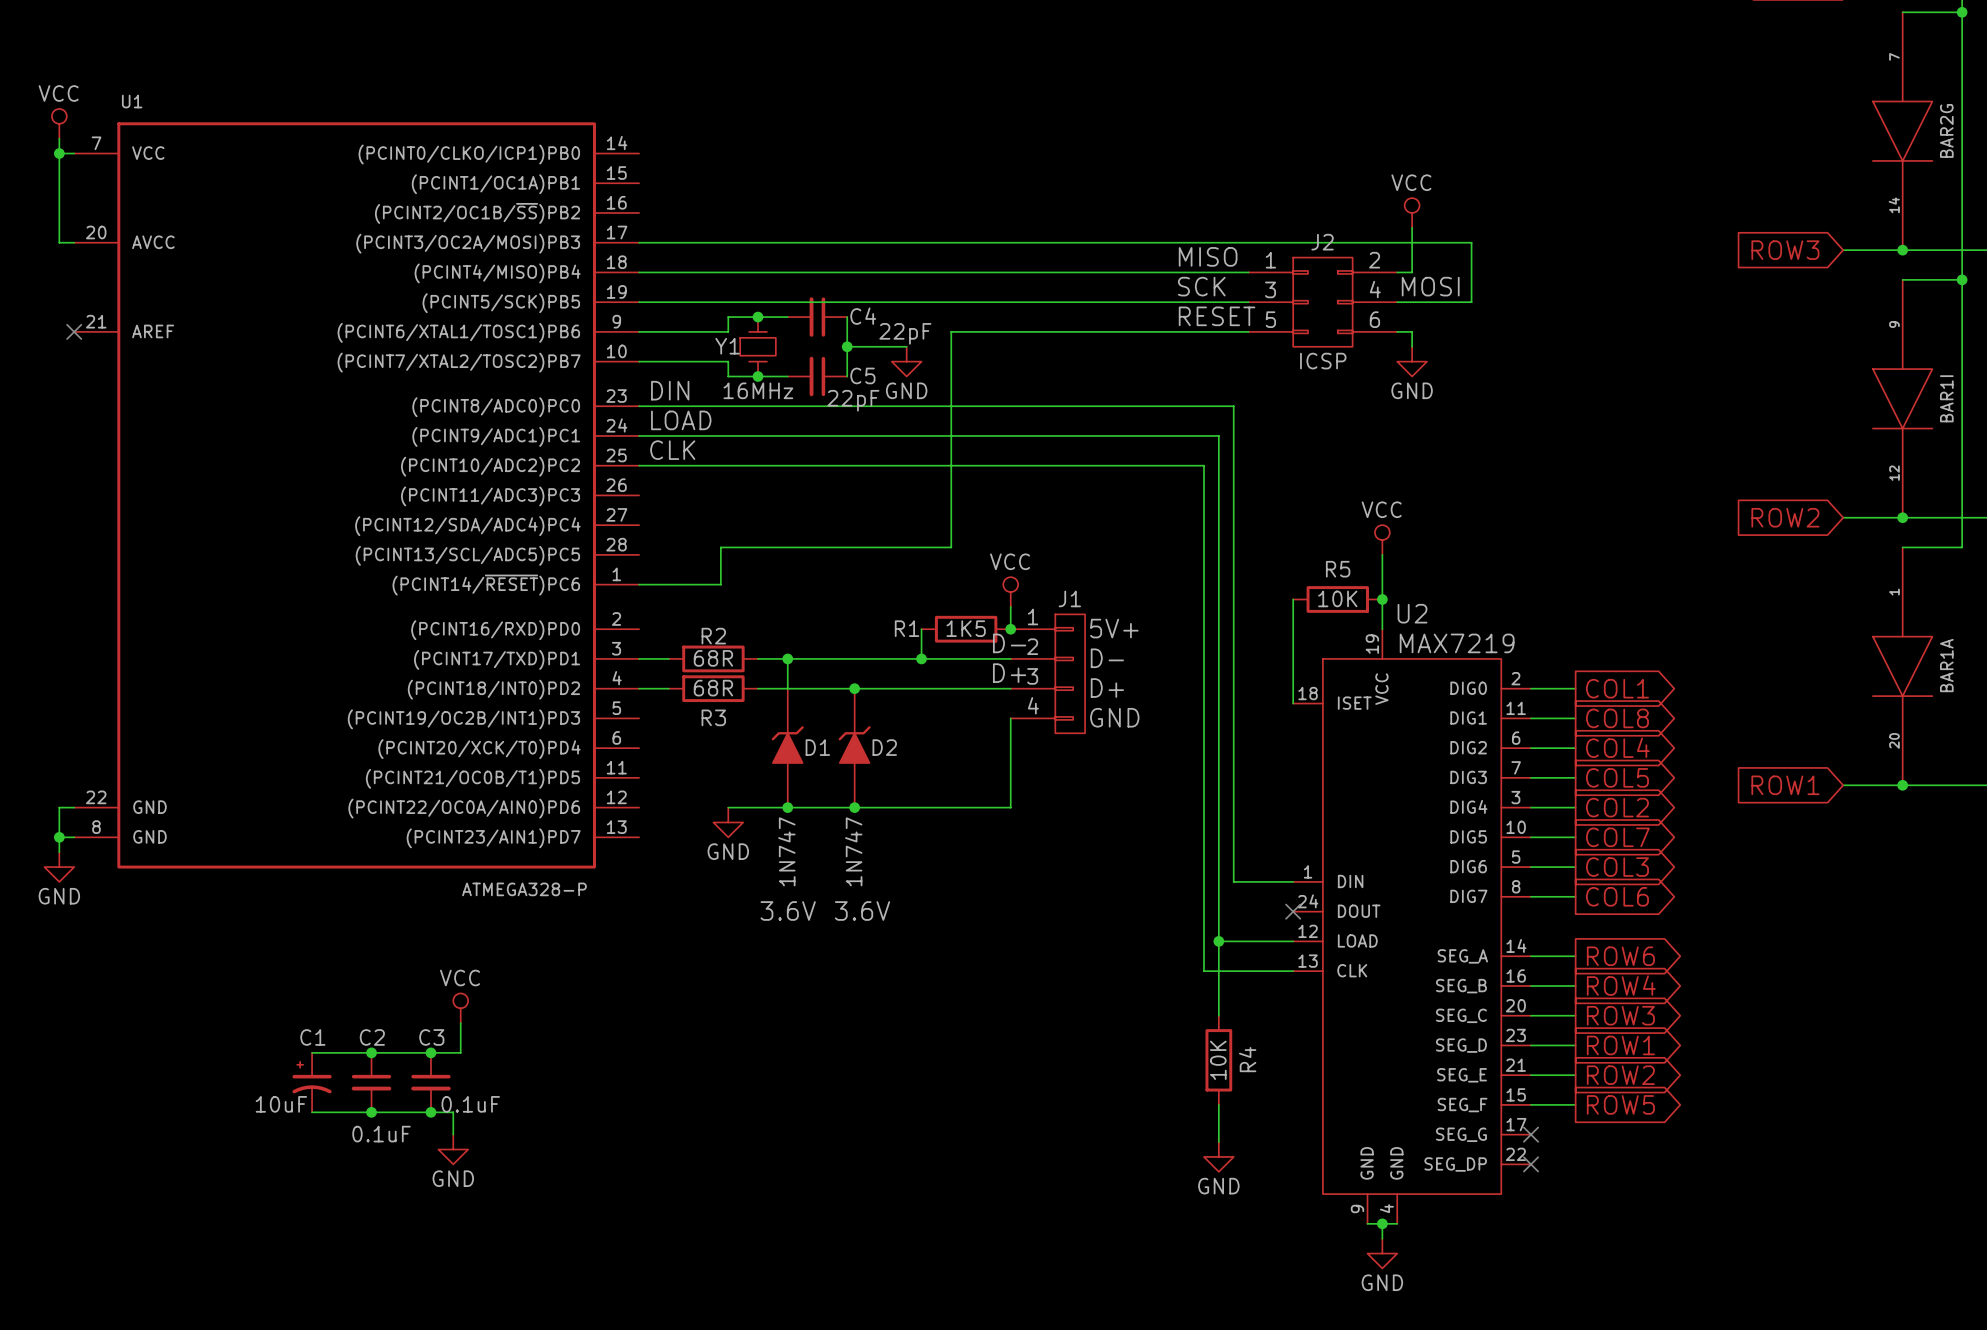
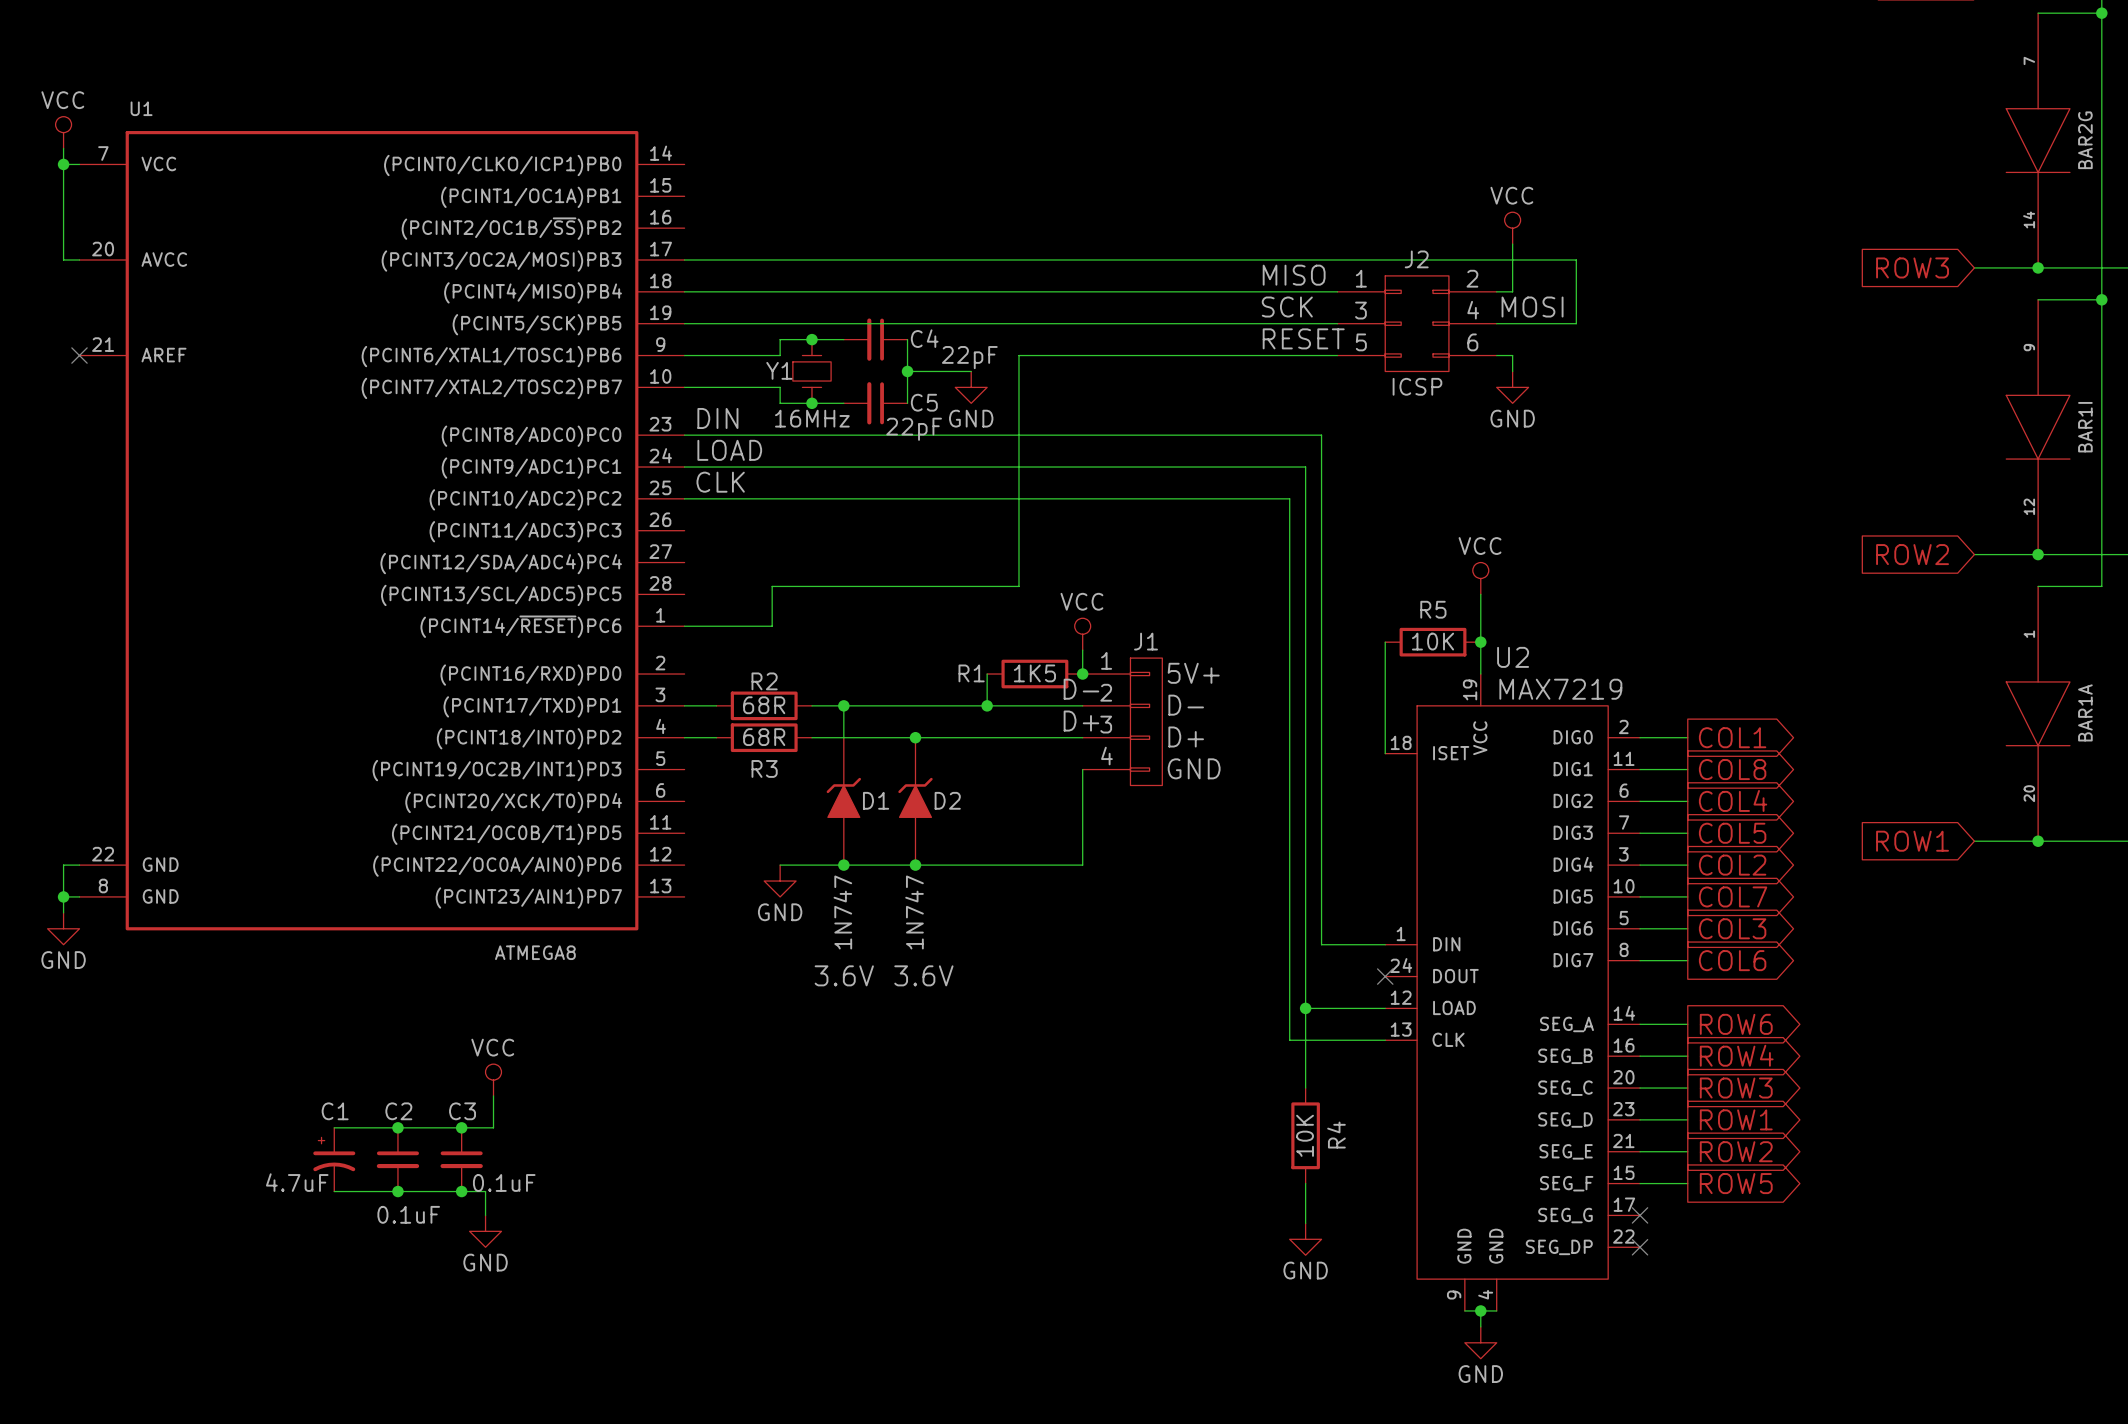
U1 value: ATMEGA328-P (524, 889) -> ATMEGA8 (535, 952)
C1 value: 10uF (281, 1104) -> 4.7uF (297, 1182)

